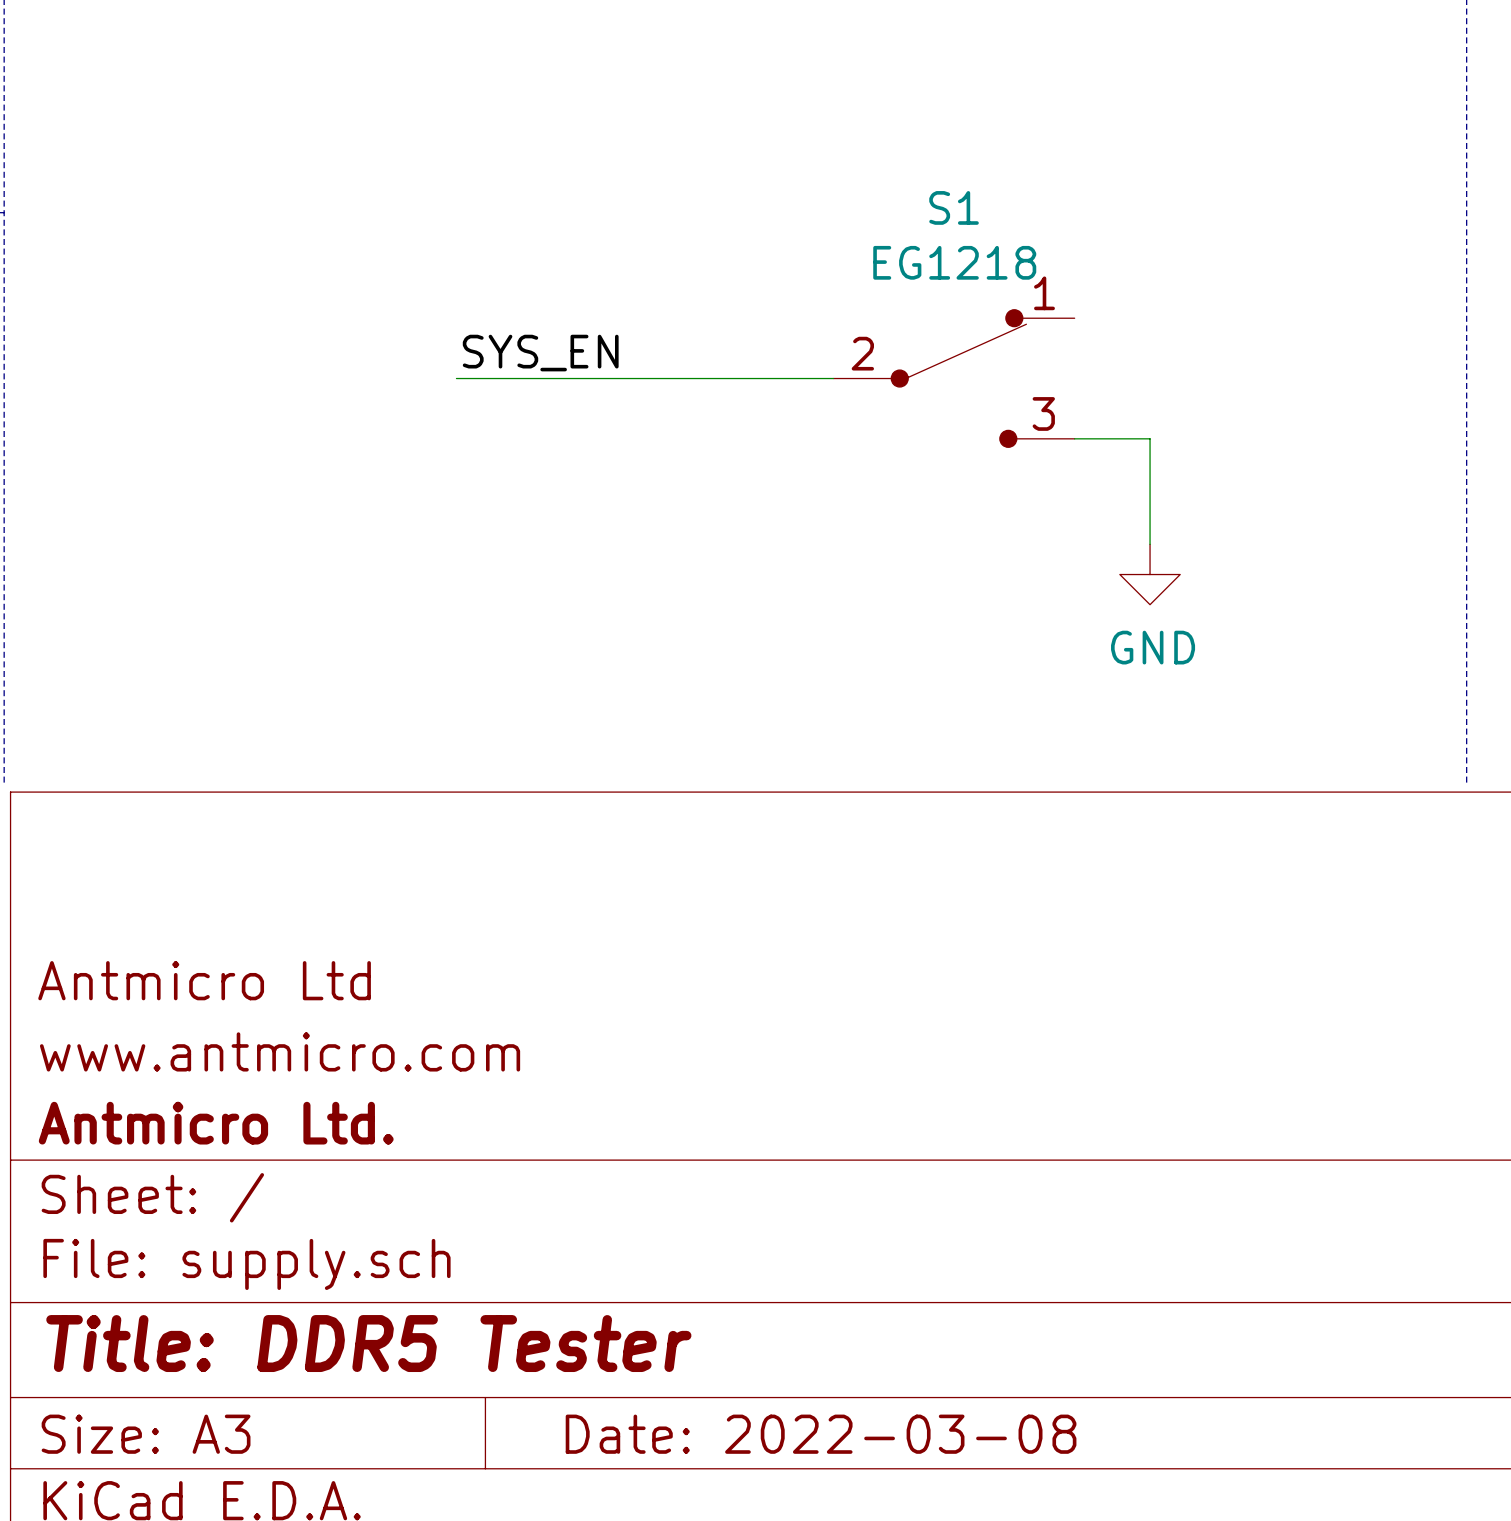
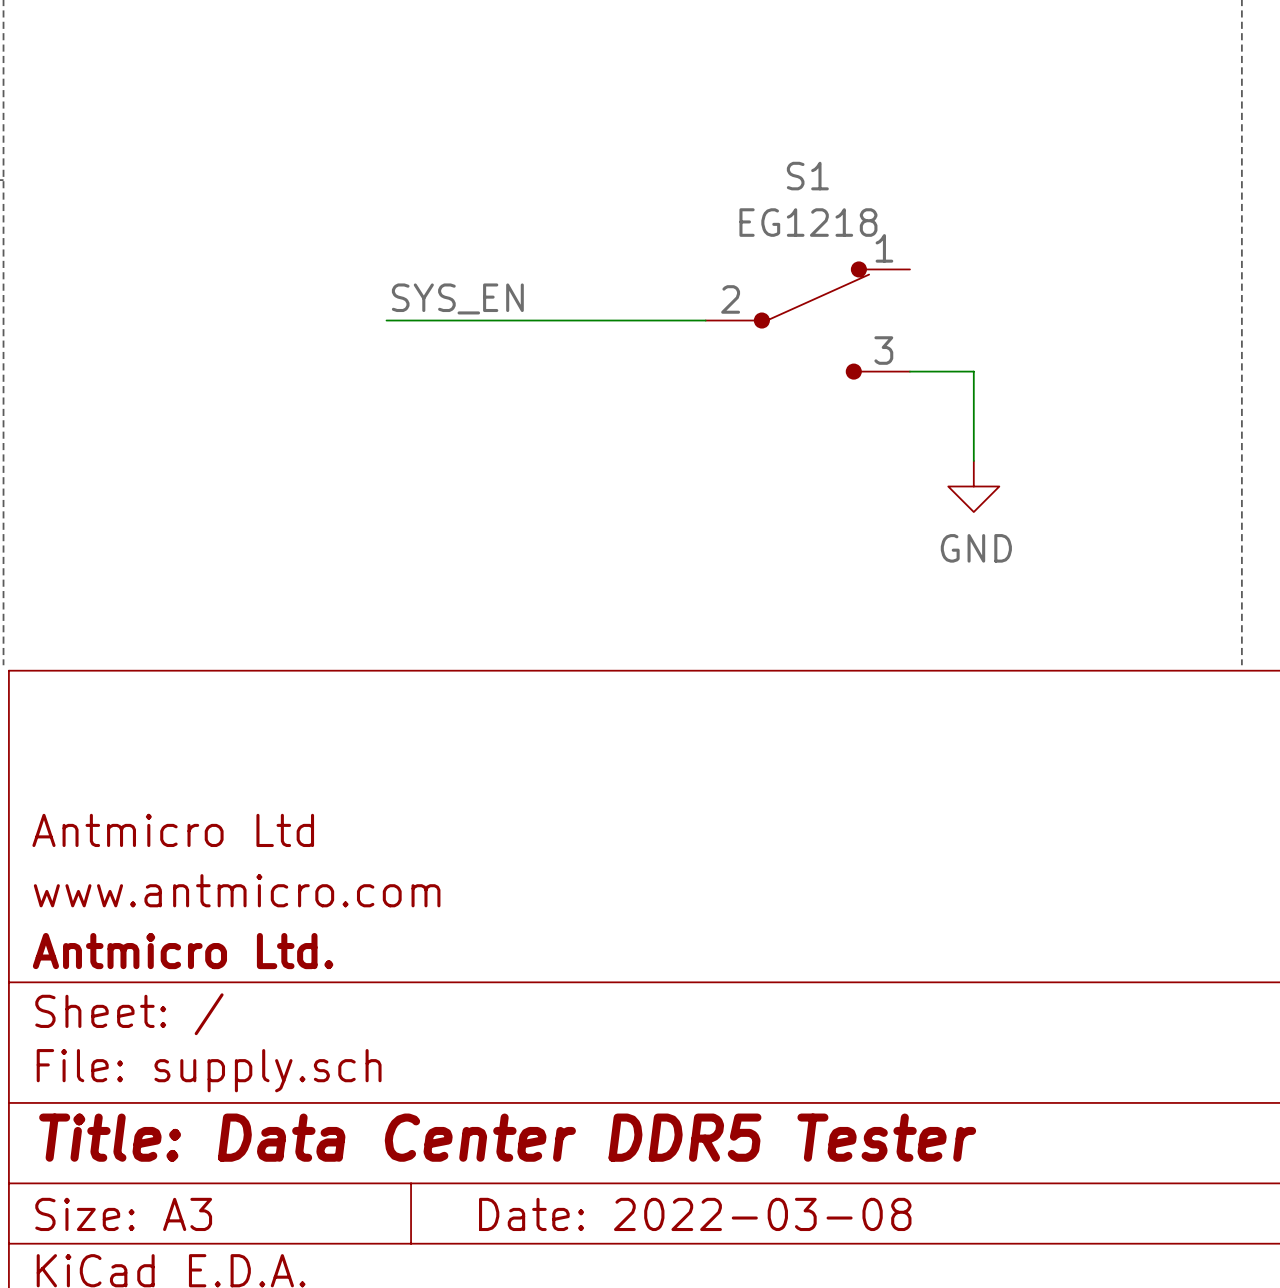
title block: Title: DDR5 Tester (368, 1343) -> Title: Data Center DDR5 Tester (507, 1137)

